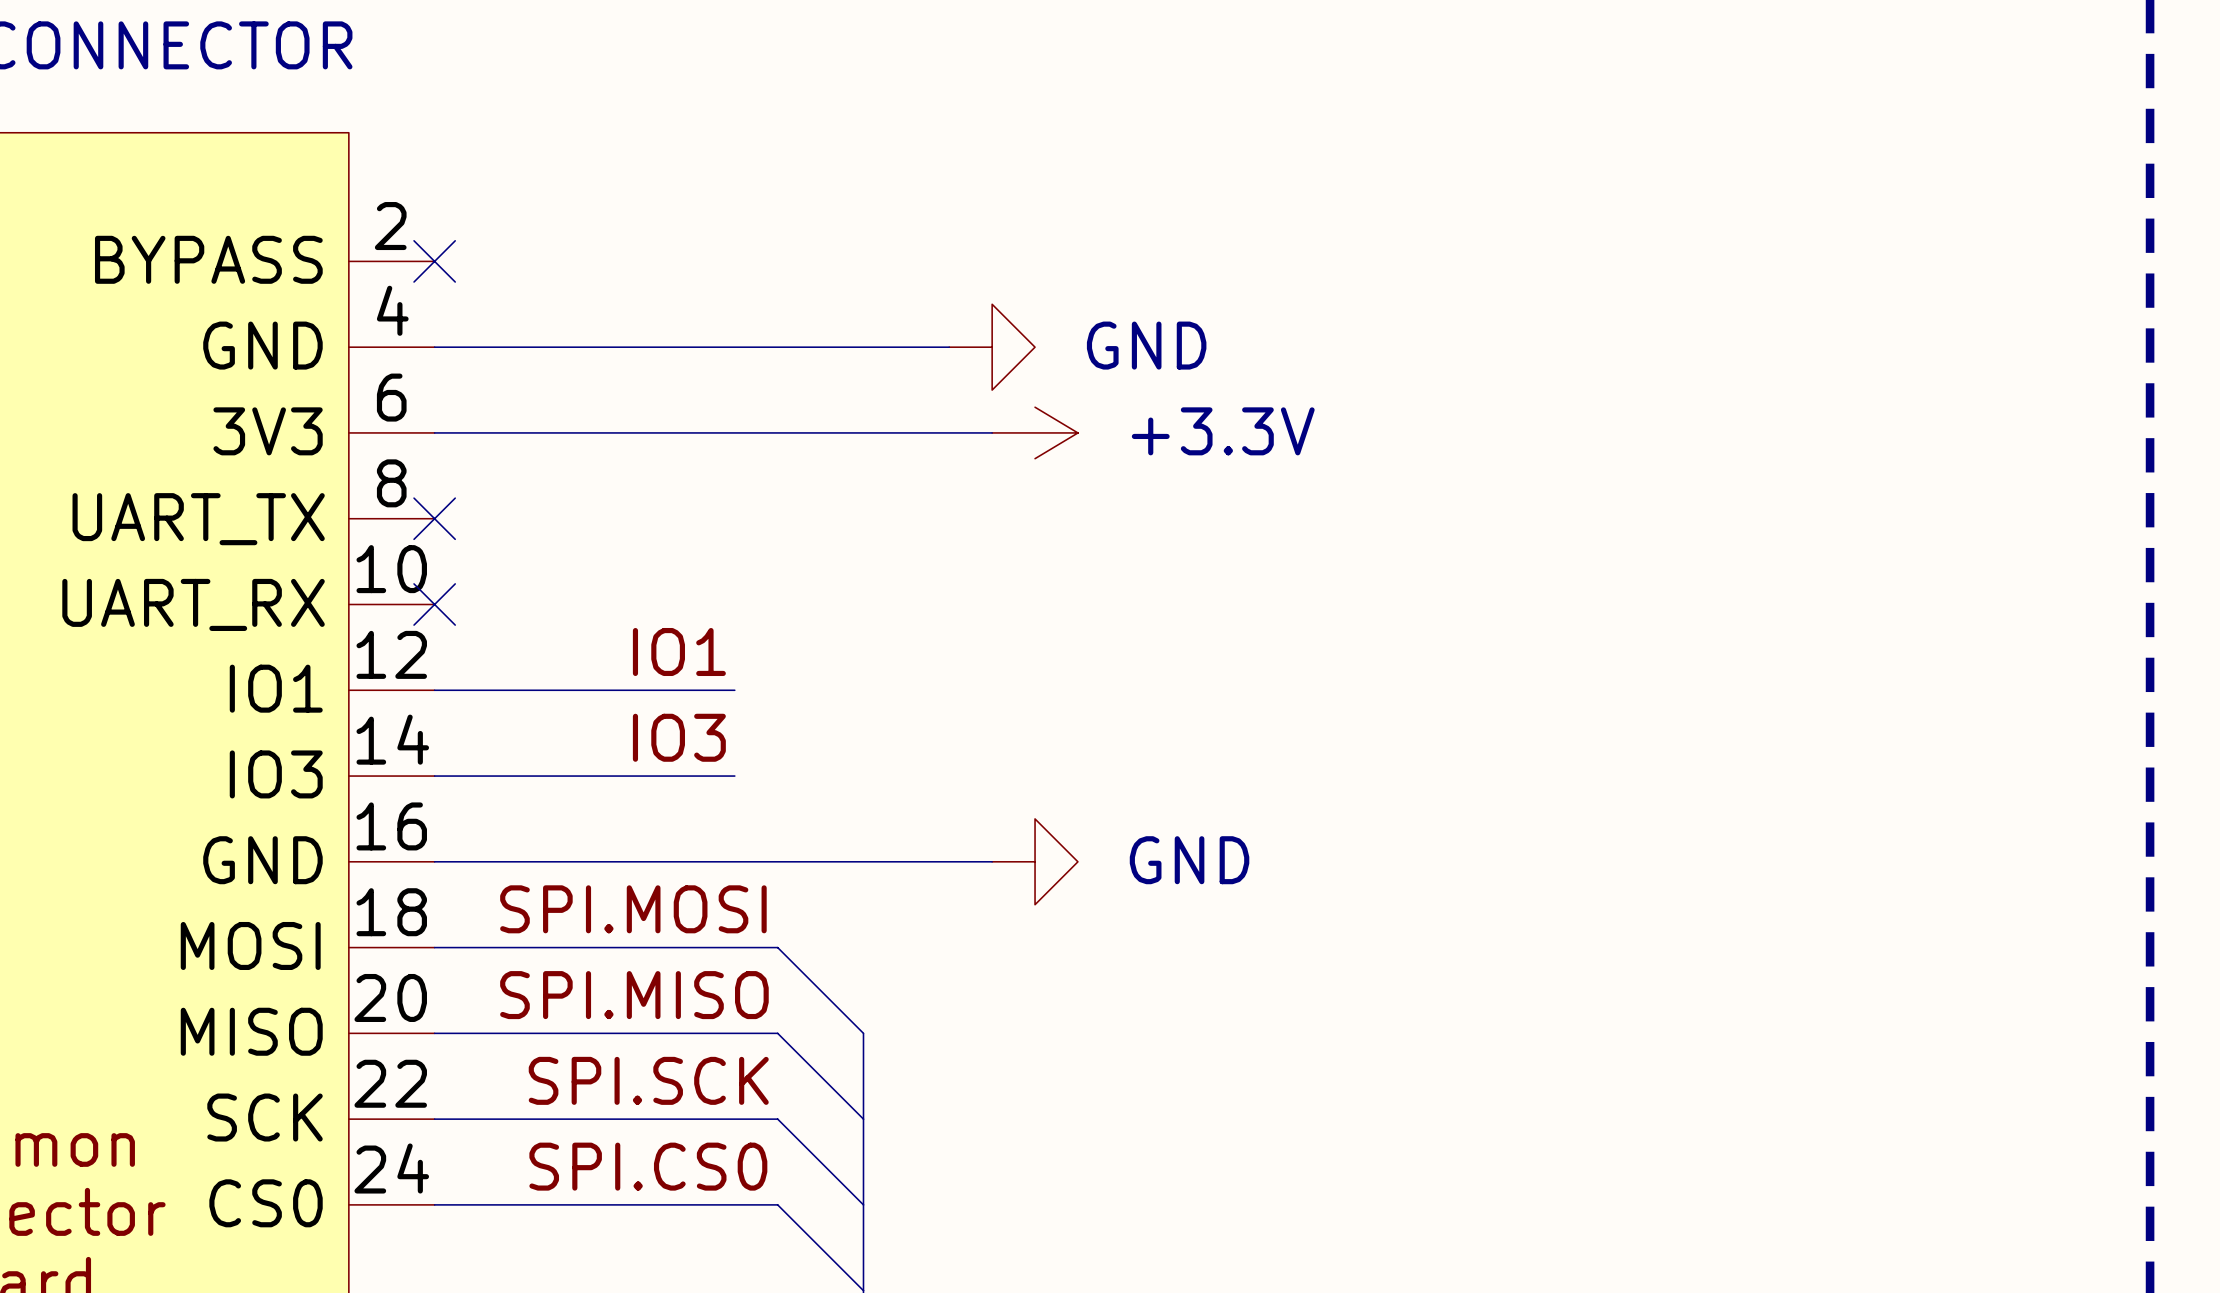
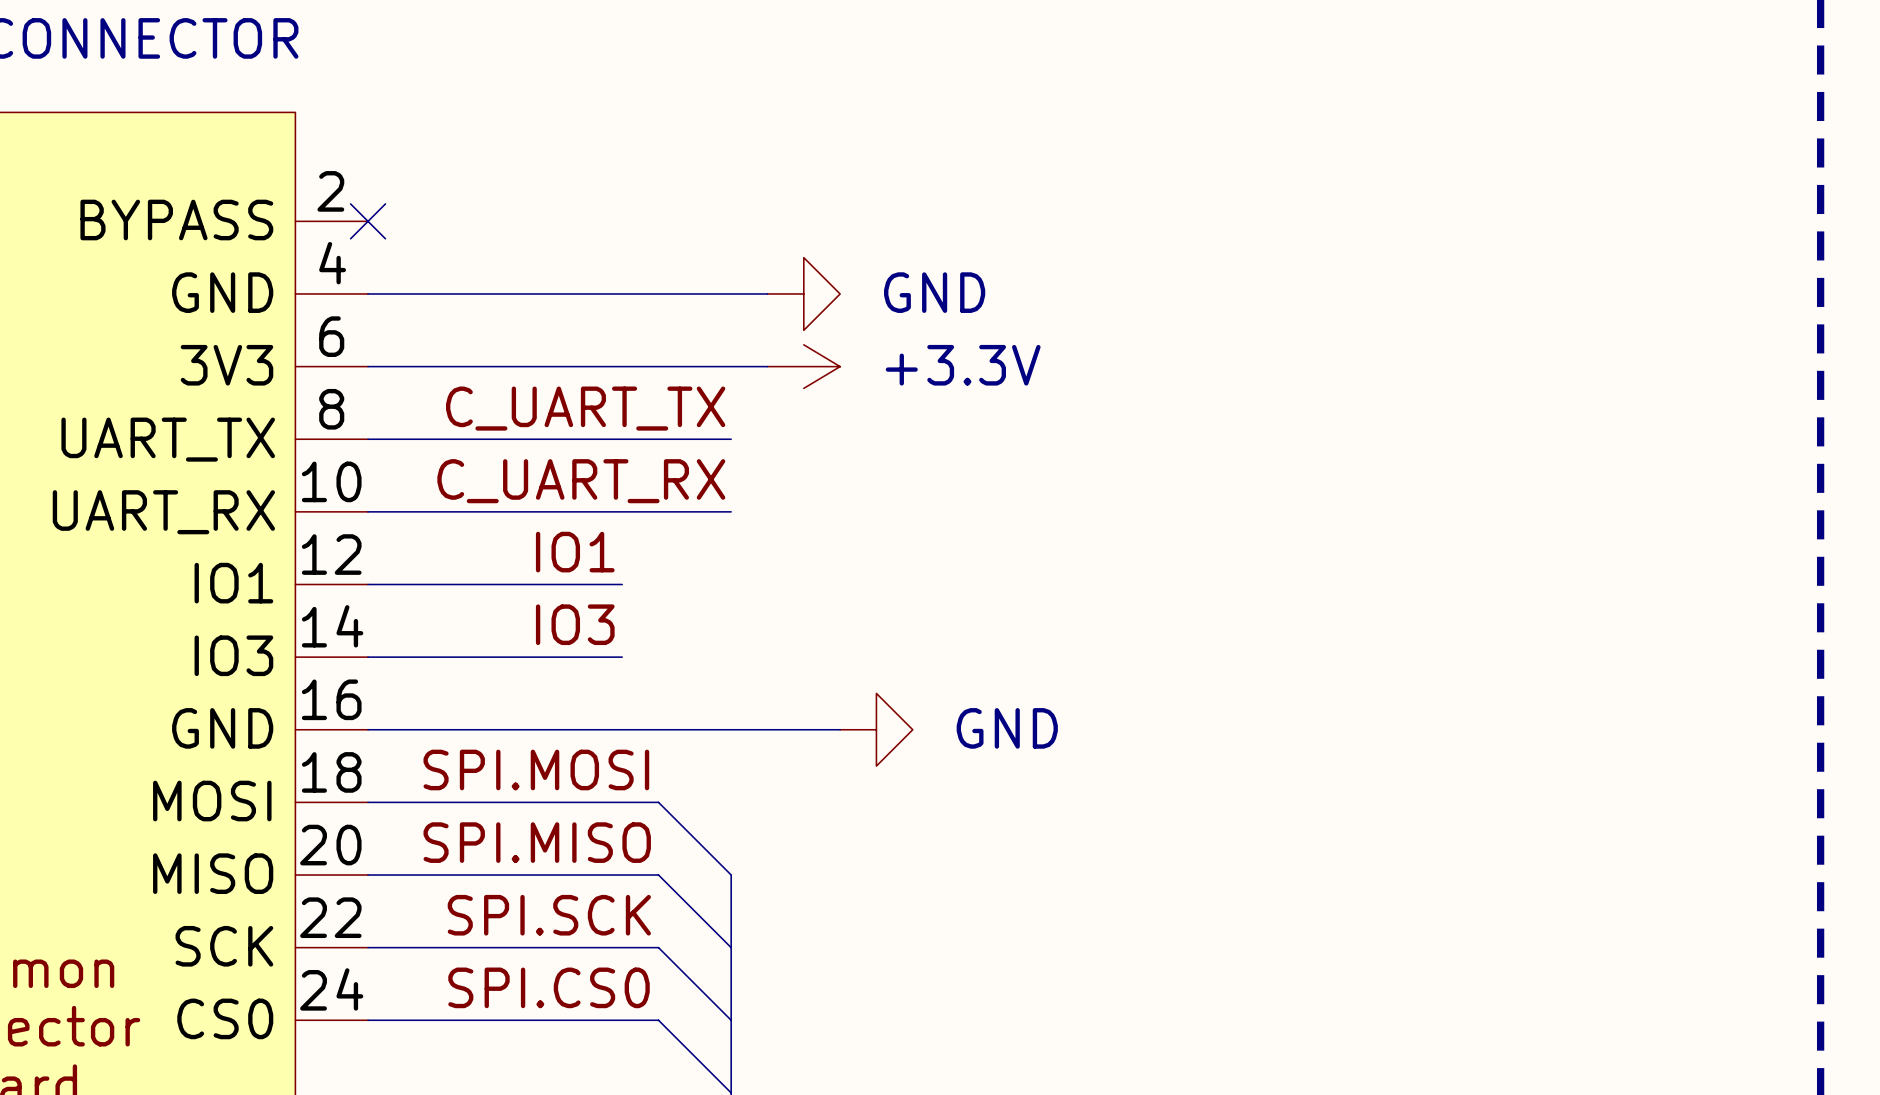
power symbol position: GND (992, 347) -> GND (803, 293)
power symbol position: +3.3V (1035, 432) -> +3.3V (803, 366)
label: none -> C_UART_TX (585, 408)
wire: none -> (368, 439) (731, 439)
no-connect mark: (434, 518) -> none
label: none -> C_UART_RX (581, 481)
wire: none -> (368, 511) (731, 511)
no-connect mark: (434, 604) -> none

